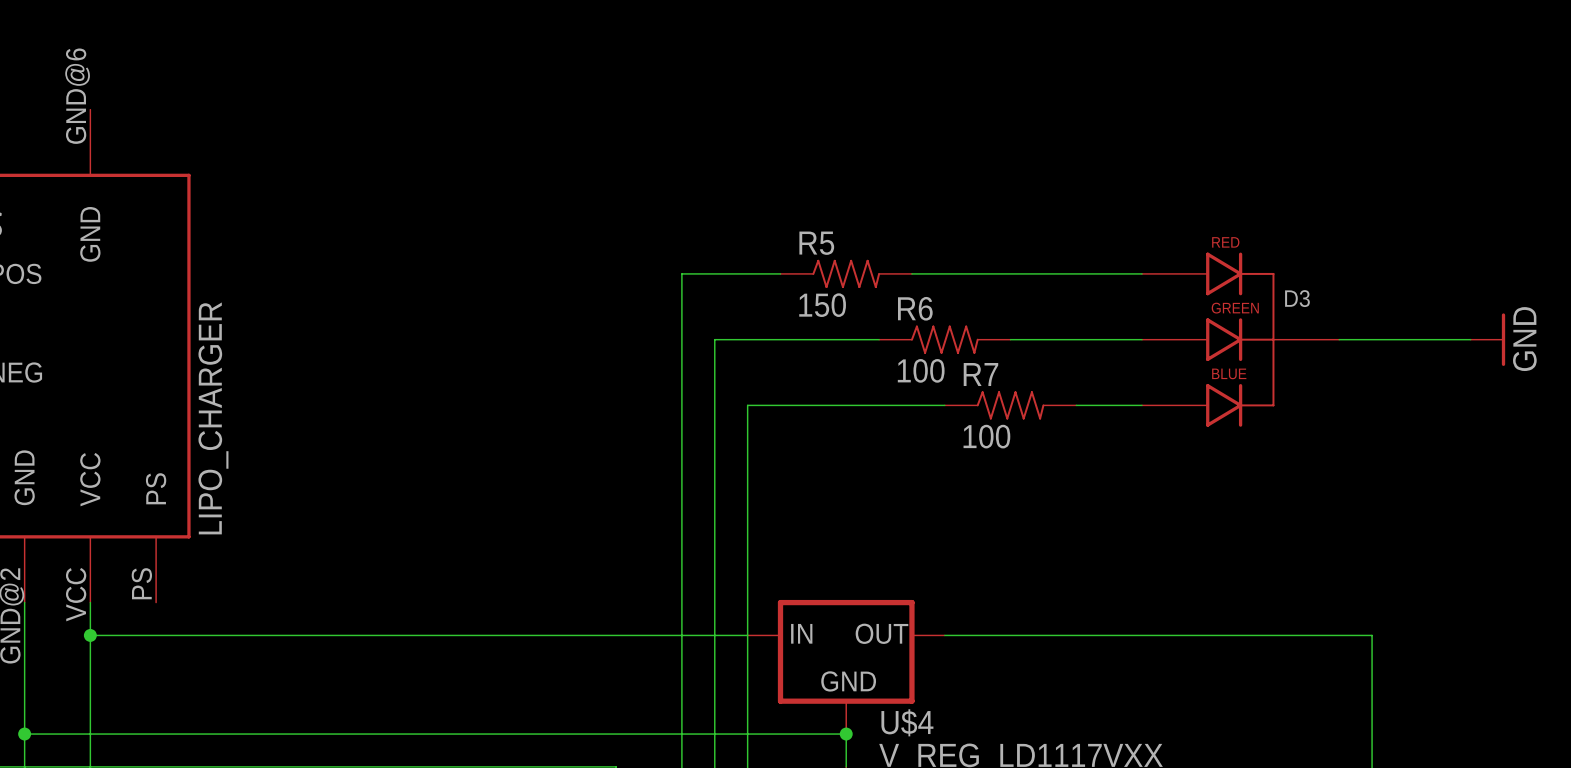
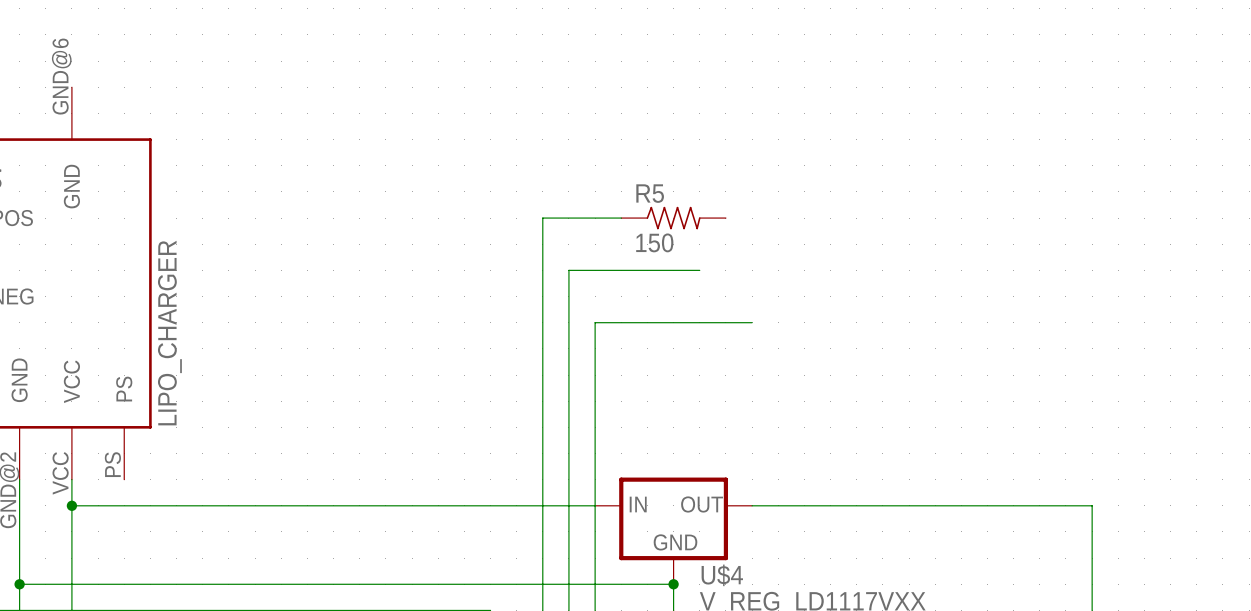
wire: (911, 273) (1142, 273) -> none
R6: 100 (944, 339) -> none
wire: (1010, 339) (1142, 339) -> none
D3: (1240, 339) -> none
wire: (1339, 339) (1470, 339) -> none
power symbol: GND (1487, 339) -> none
R7: 100 (1010, 405) -> none
wire: (1076, 405) (1142, 405) -> none

